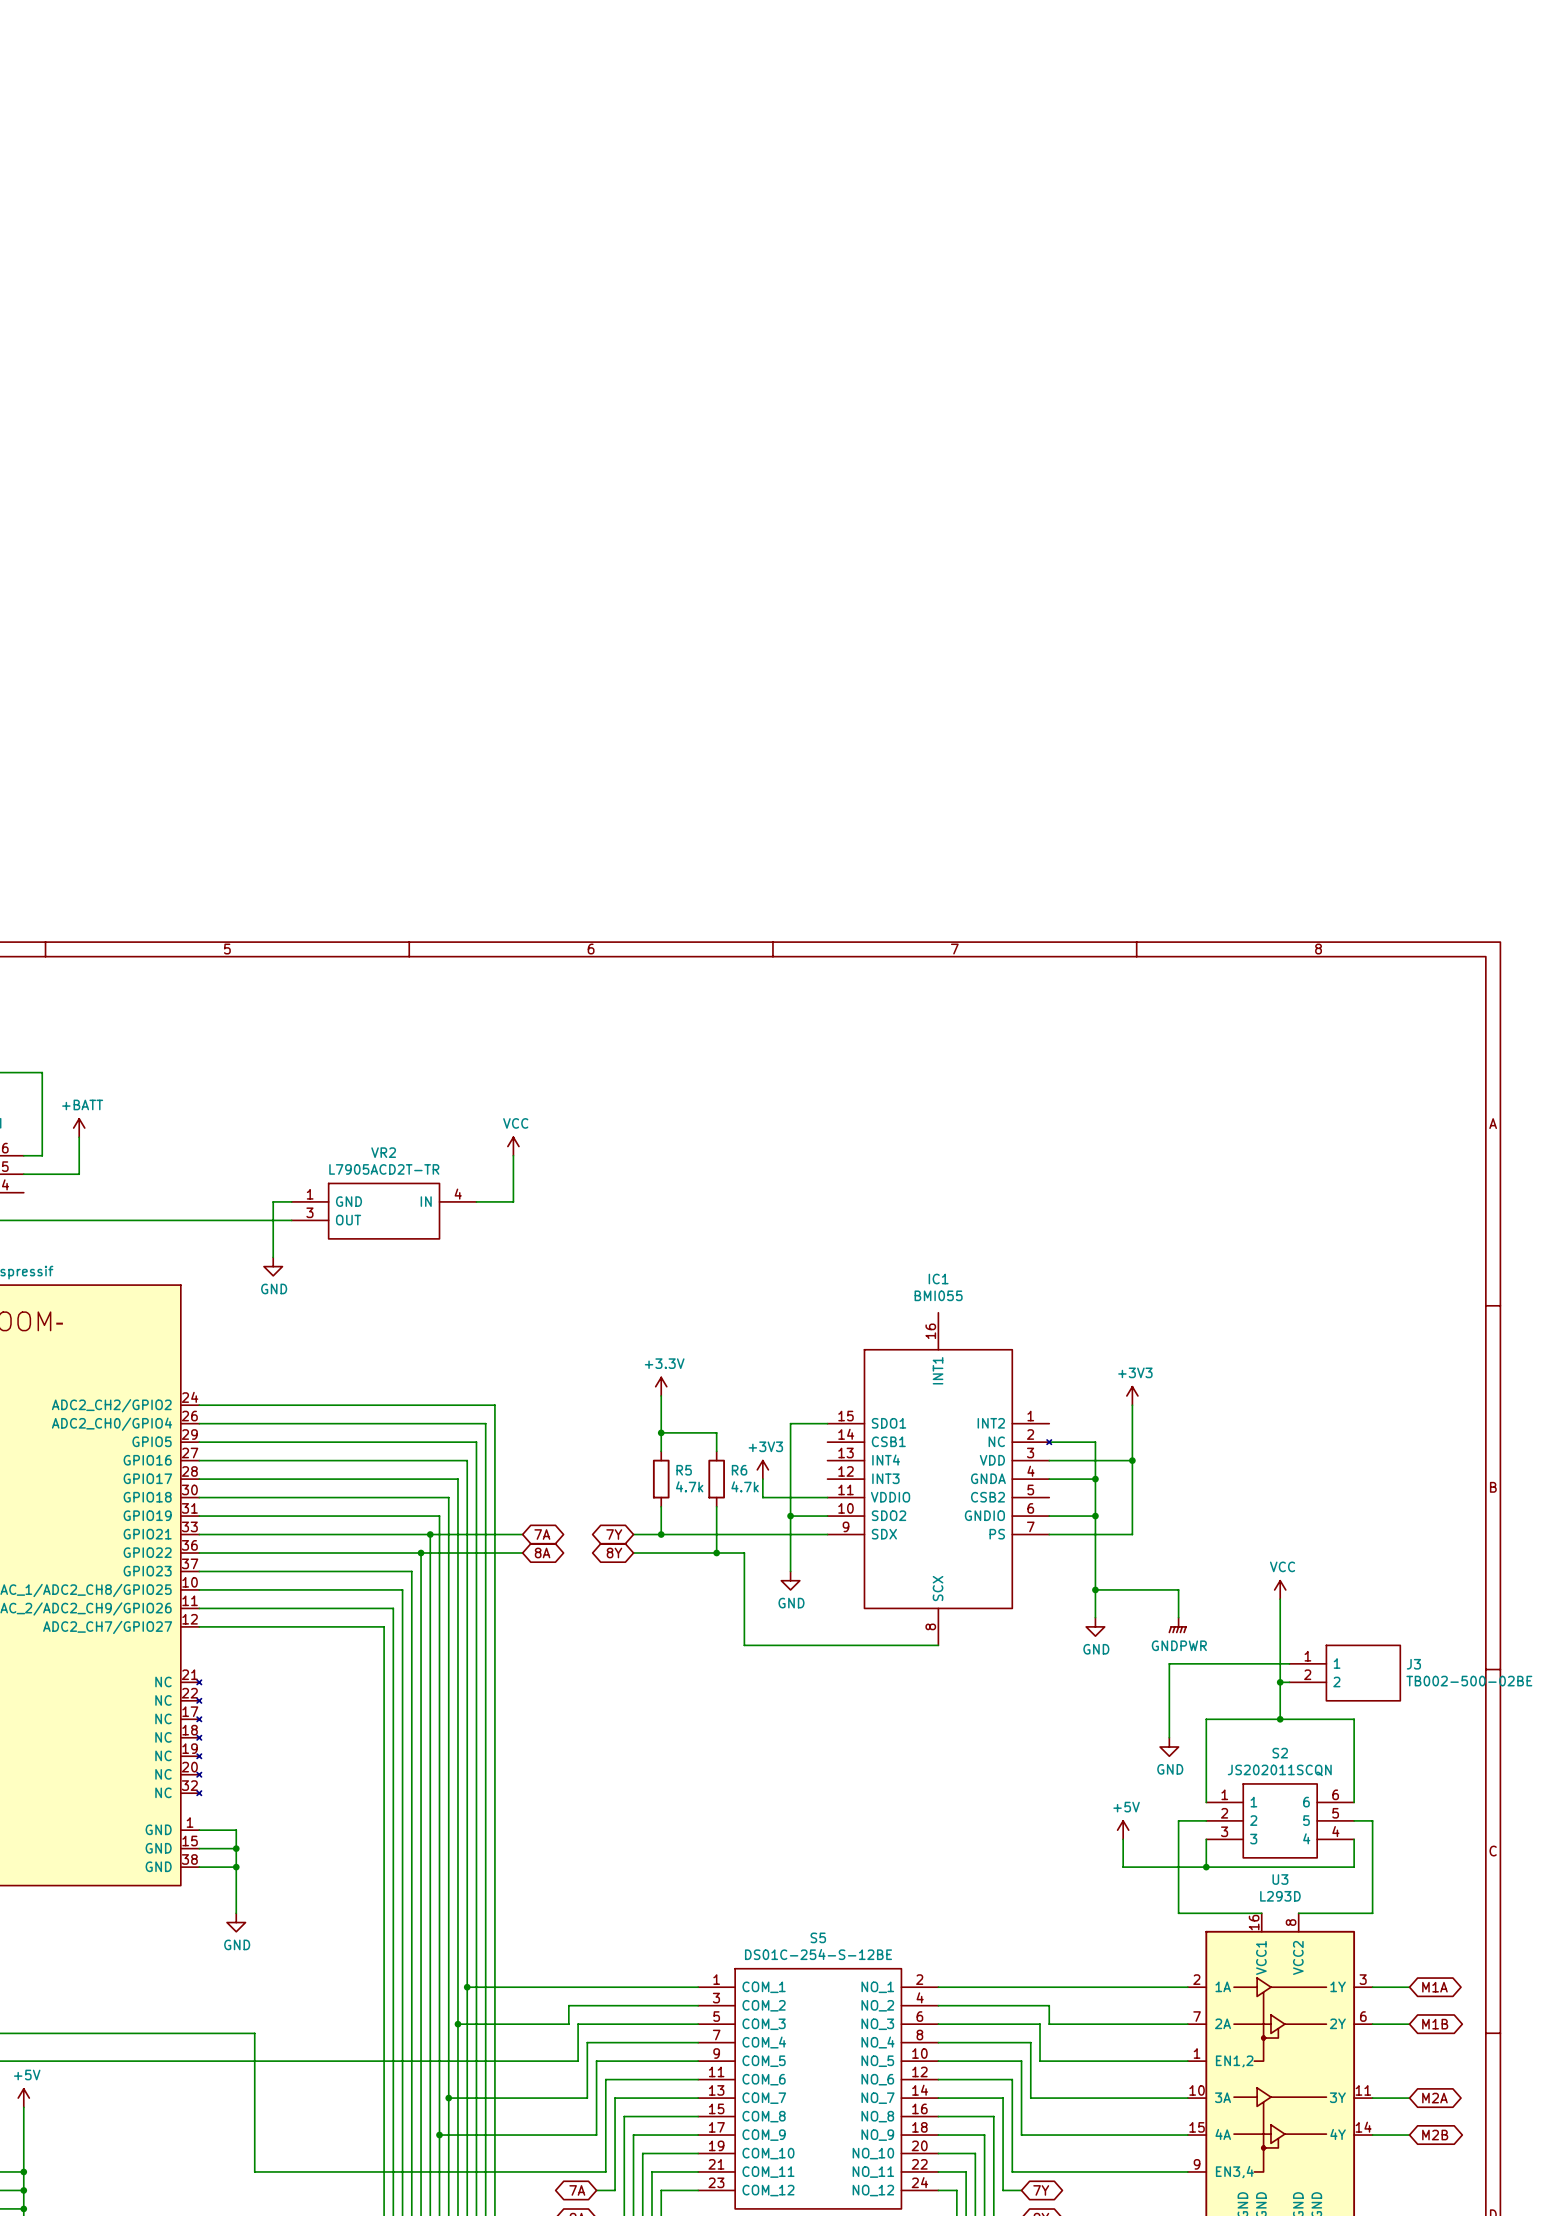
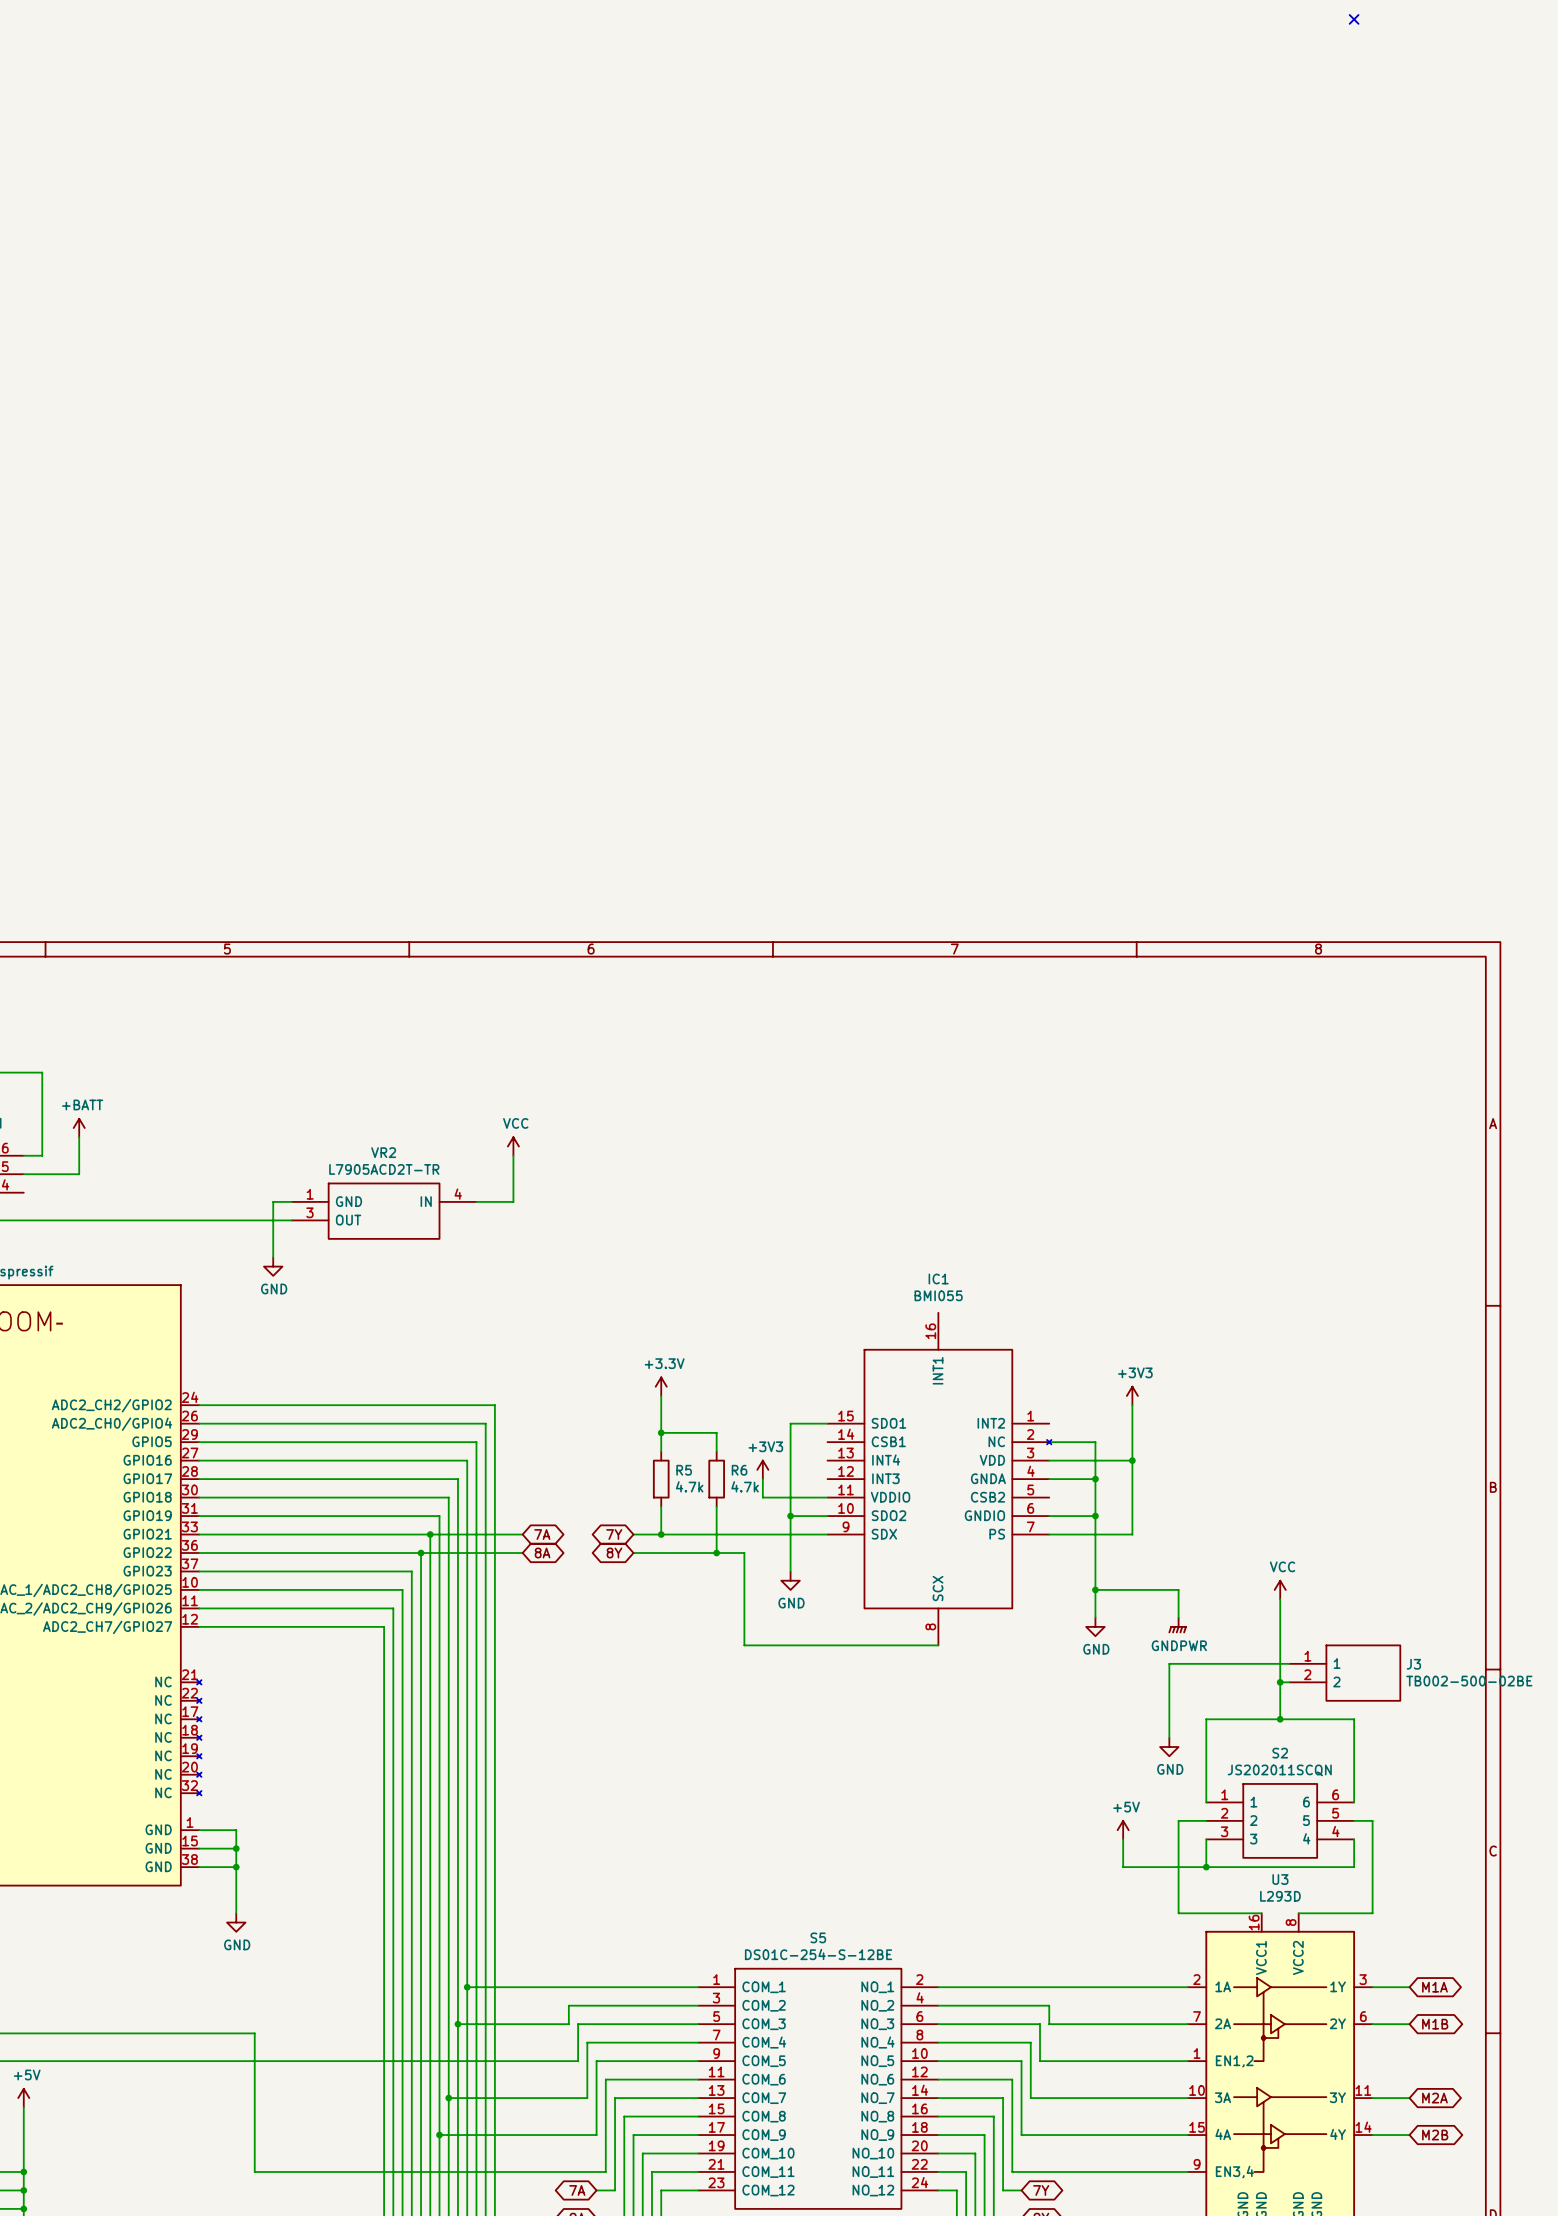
no-connect mark: none -> (1354, 19)

